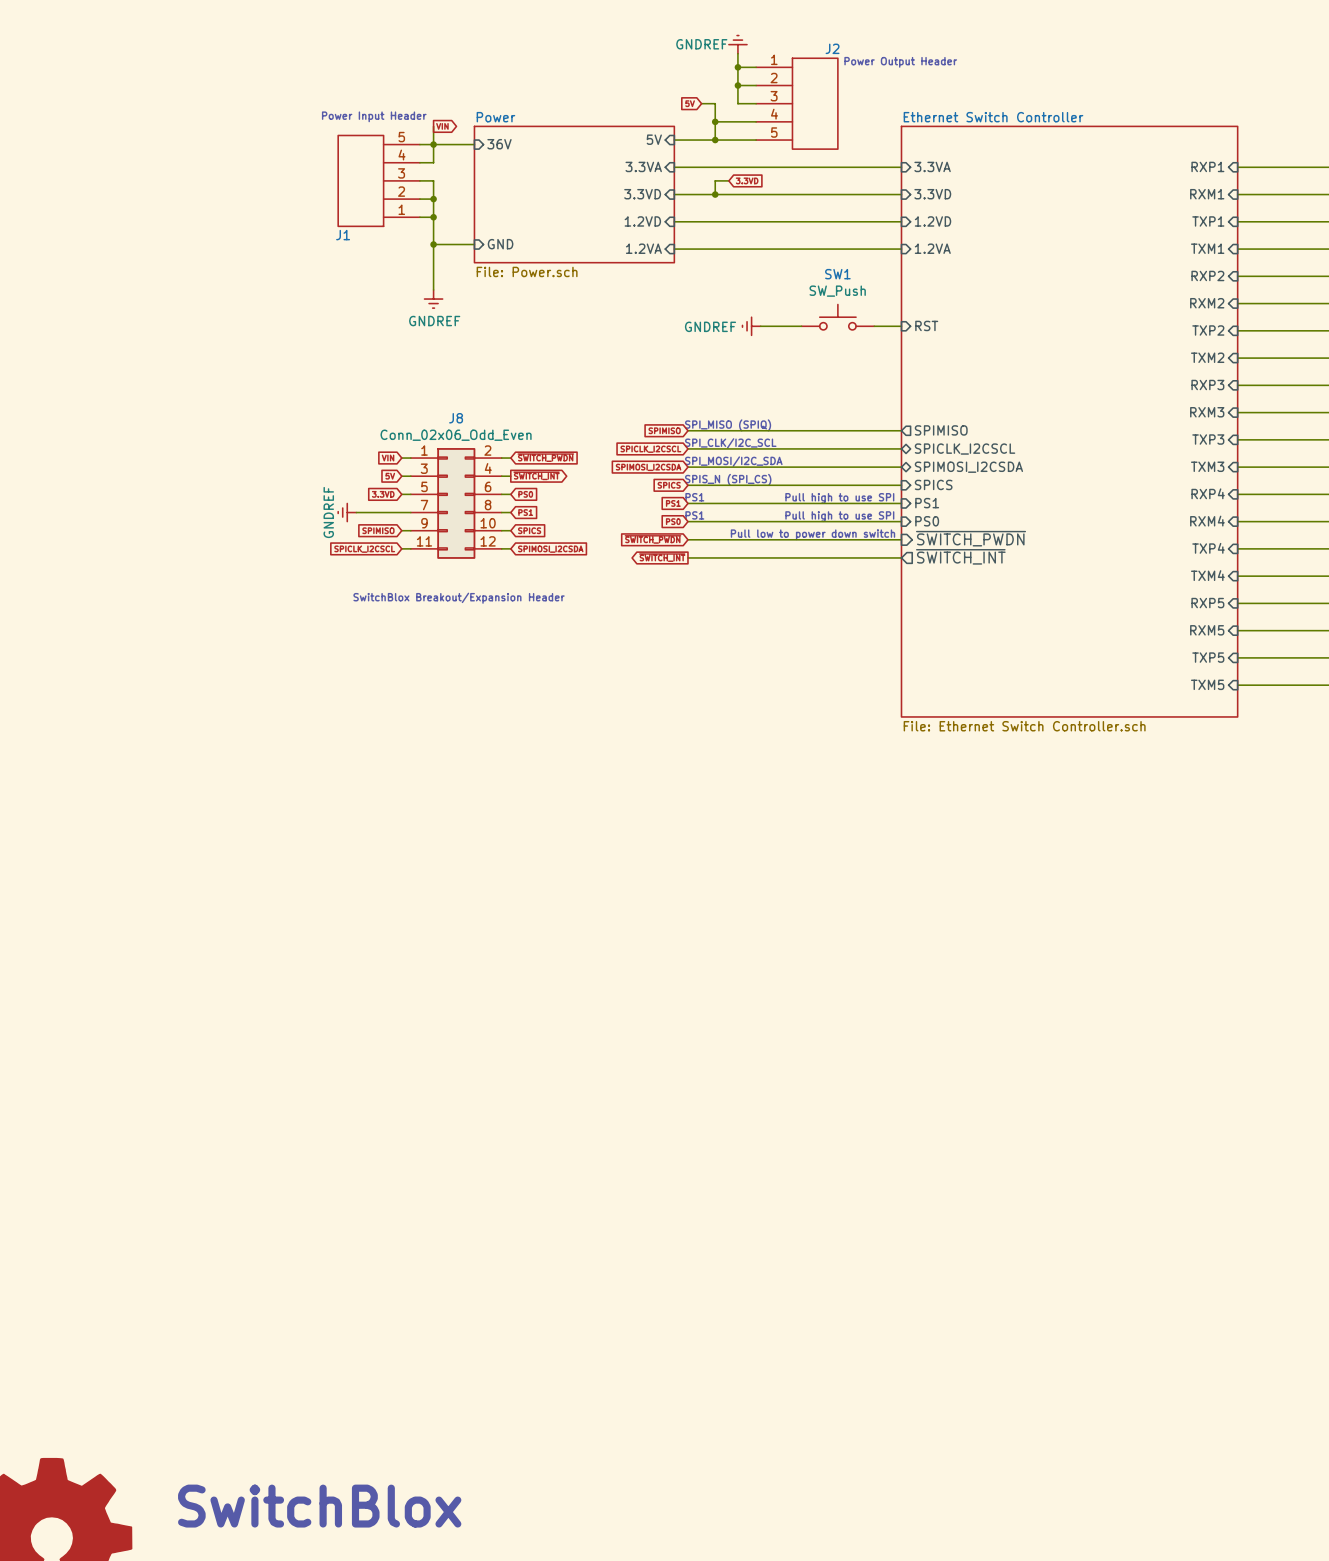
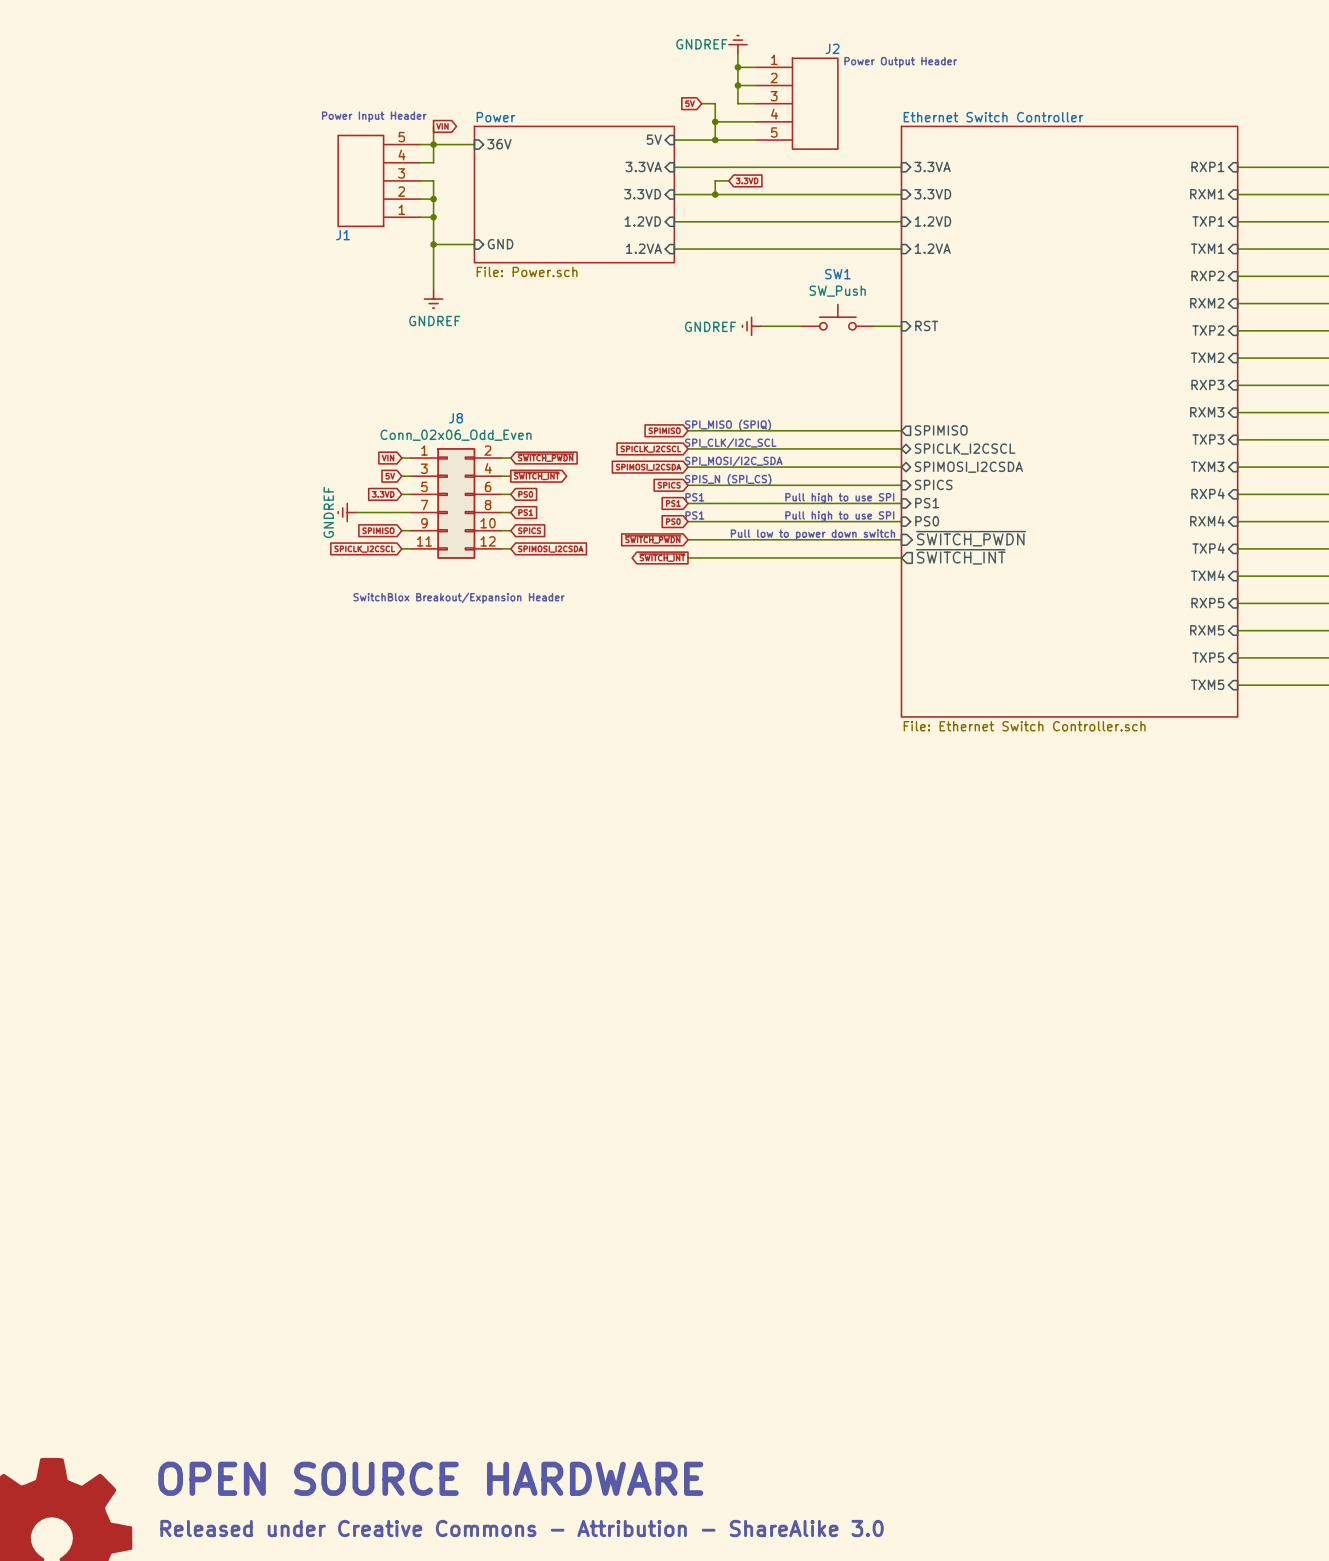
text: none -> OPEN SOURCE HARDWARE (430, 1478)
text: SwitchBlox (319, 1506) -> none
text: none -> Released under Creative Commons - Attribution - ShareAlike 3.0 (522, 1528)

